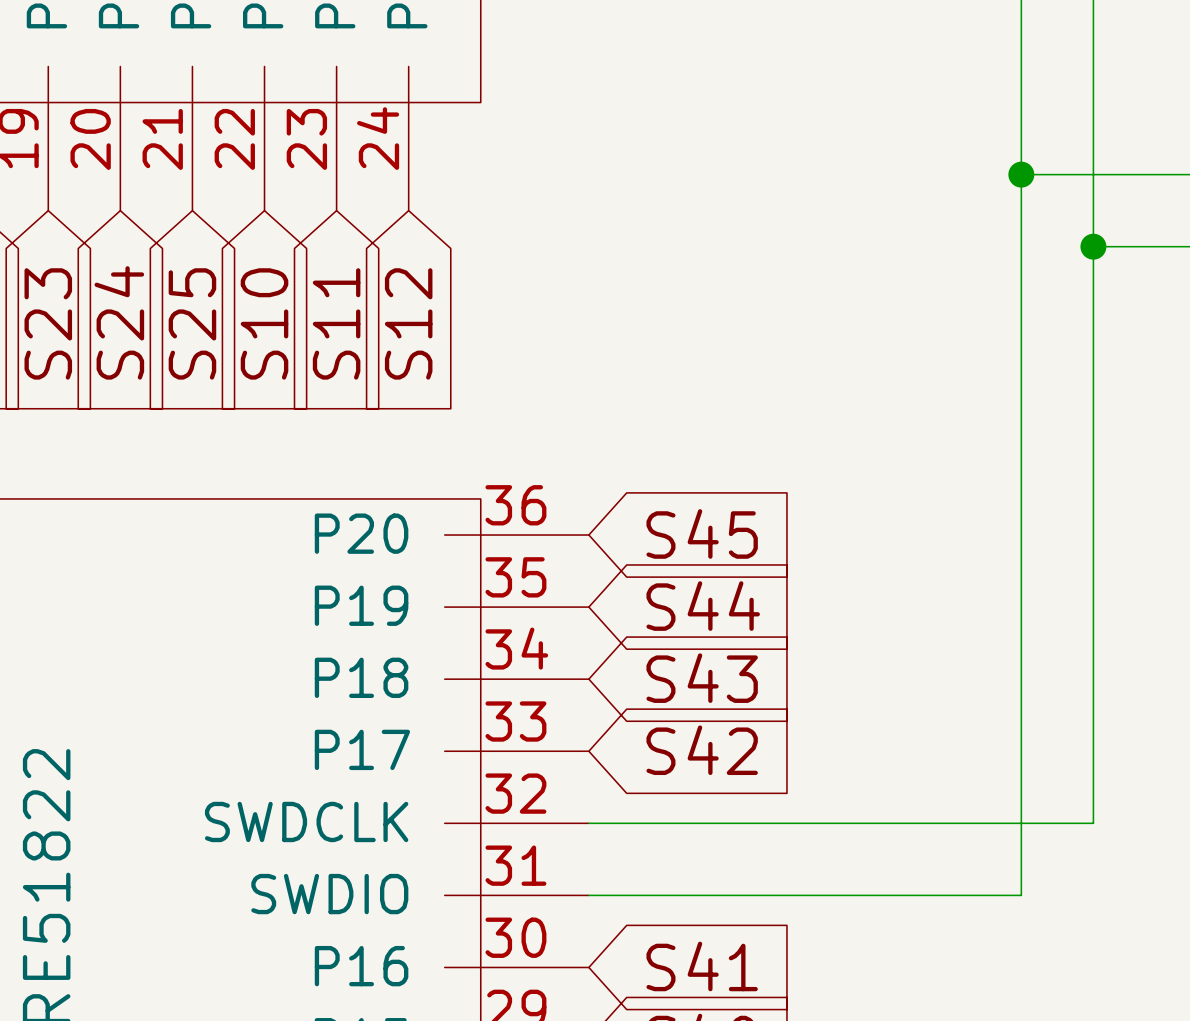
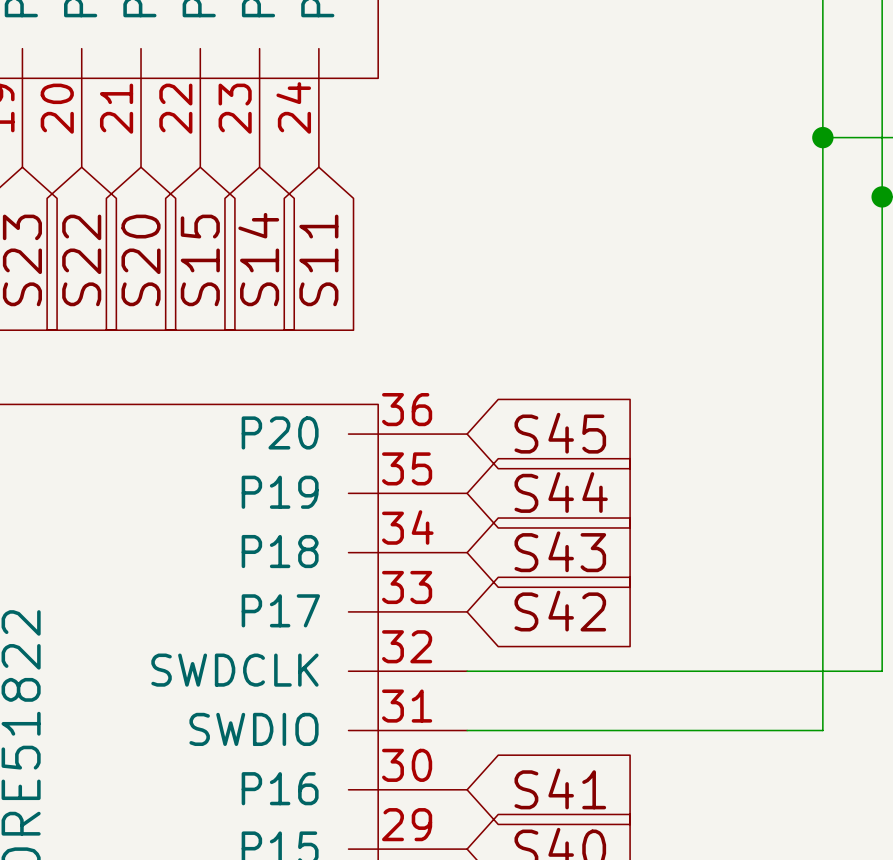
global label: S24 (119, 322) -> S22 (81, 260)
global label: S25 (192, 323) -> S20 (141, 260)
global label: S10 (264, 323) -> S15 (200, 260)
global label: S11 (336, 323) -> S14 (258, 259)
global label: S12 (408, 323) -> S11 (318, 260)

